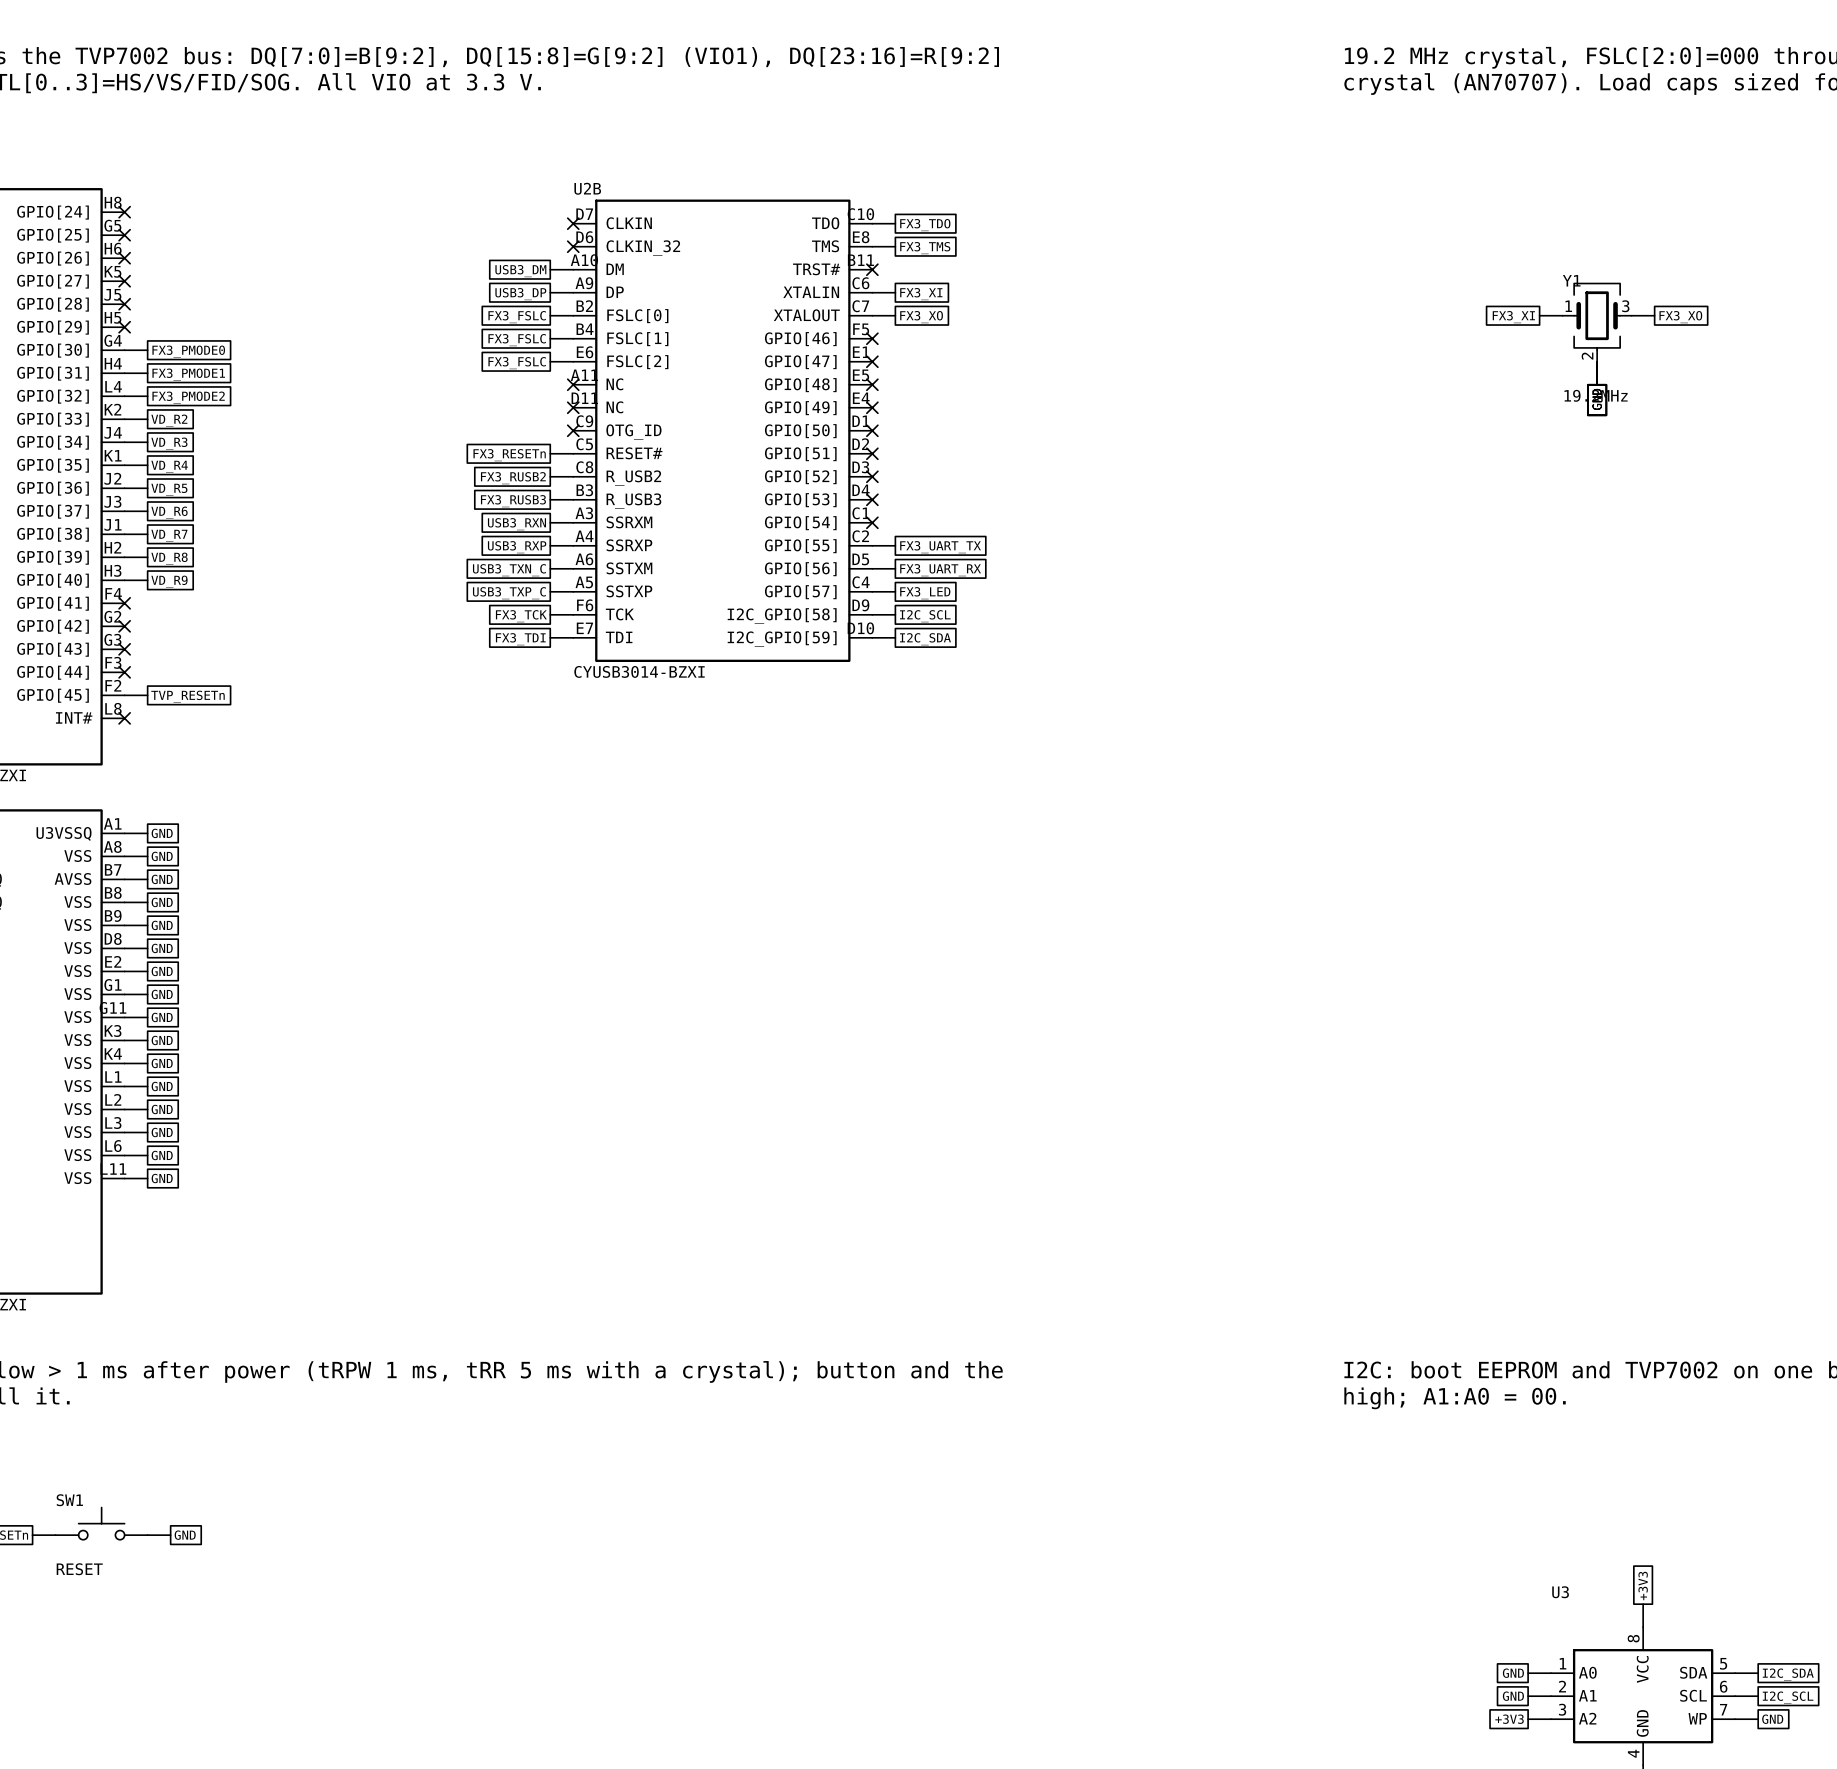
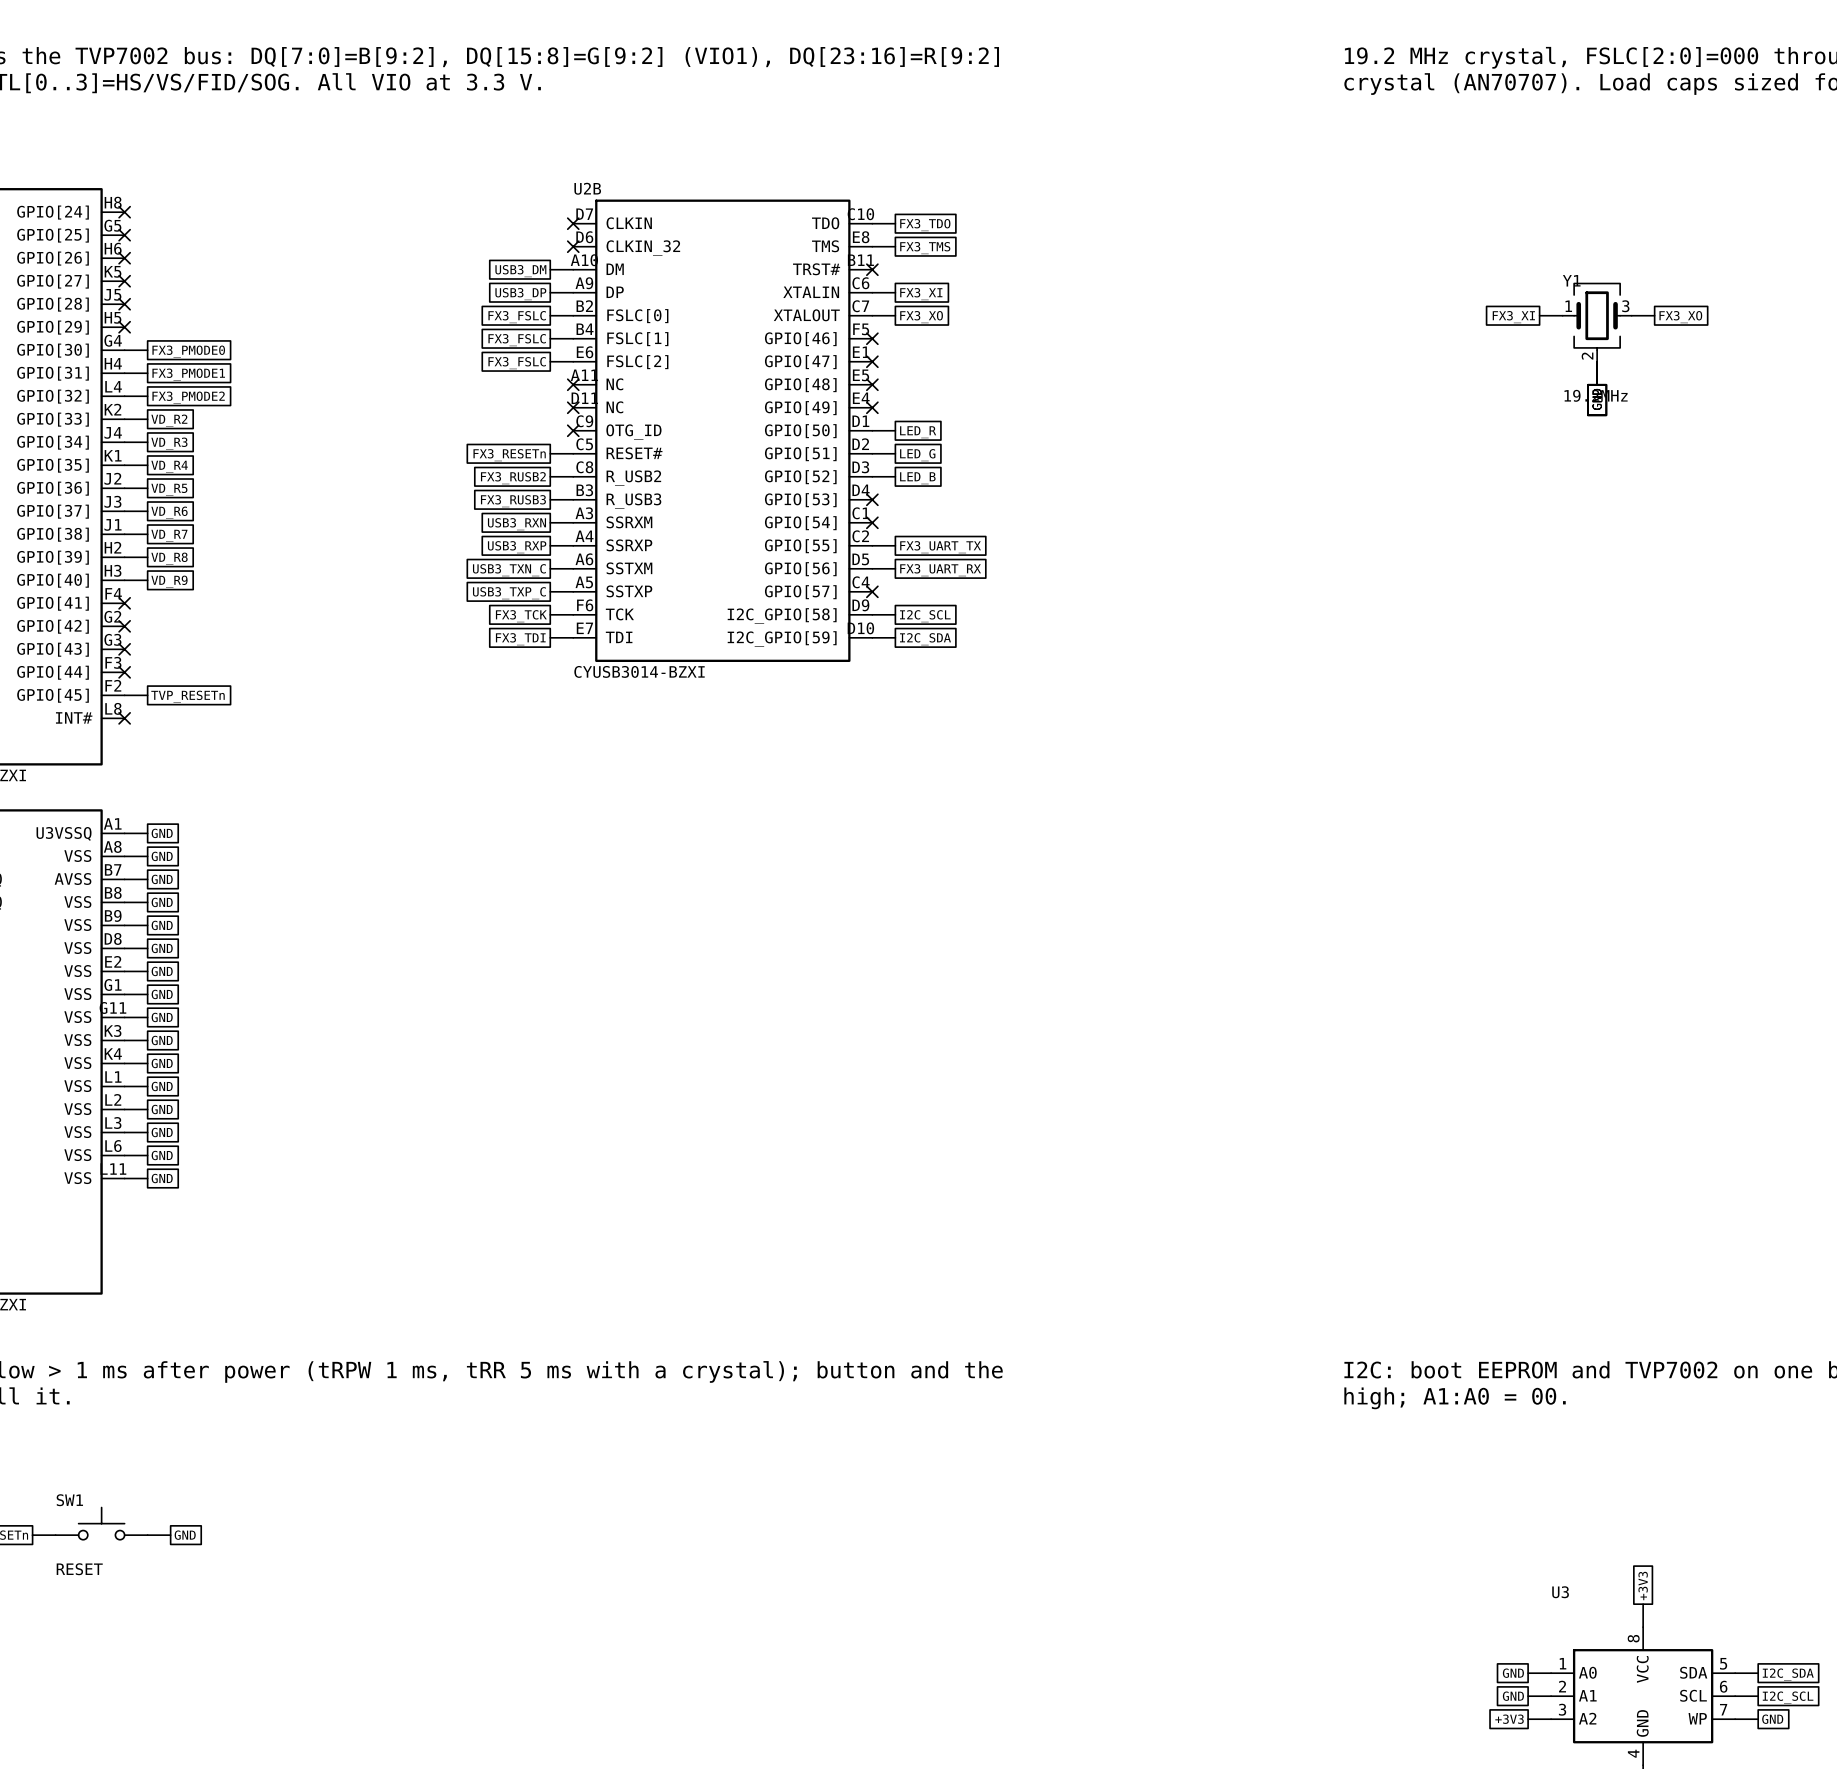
wire: none -> (872, 430) (895, 430)
no-connect mark: (872, 430) -> none
global label: none -> LED_R (918, 432)
wire: none -> (872, 453) (895, 453)
no-connect mark: (872, 453) -> none
global label: none -> LED_G (917, 455)
no-connect mark: (872, 476) -> none
global label: none -> LED_B (917, 478)
wire: (872, 591) (895, 591) -> (872, 476) (895, 476)
no-connect mark: none -> (872, 591)
global label: FX3_LED (925, 593) -> none

